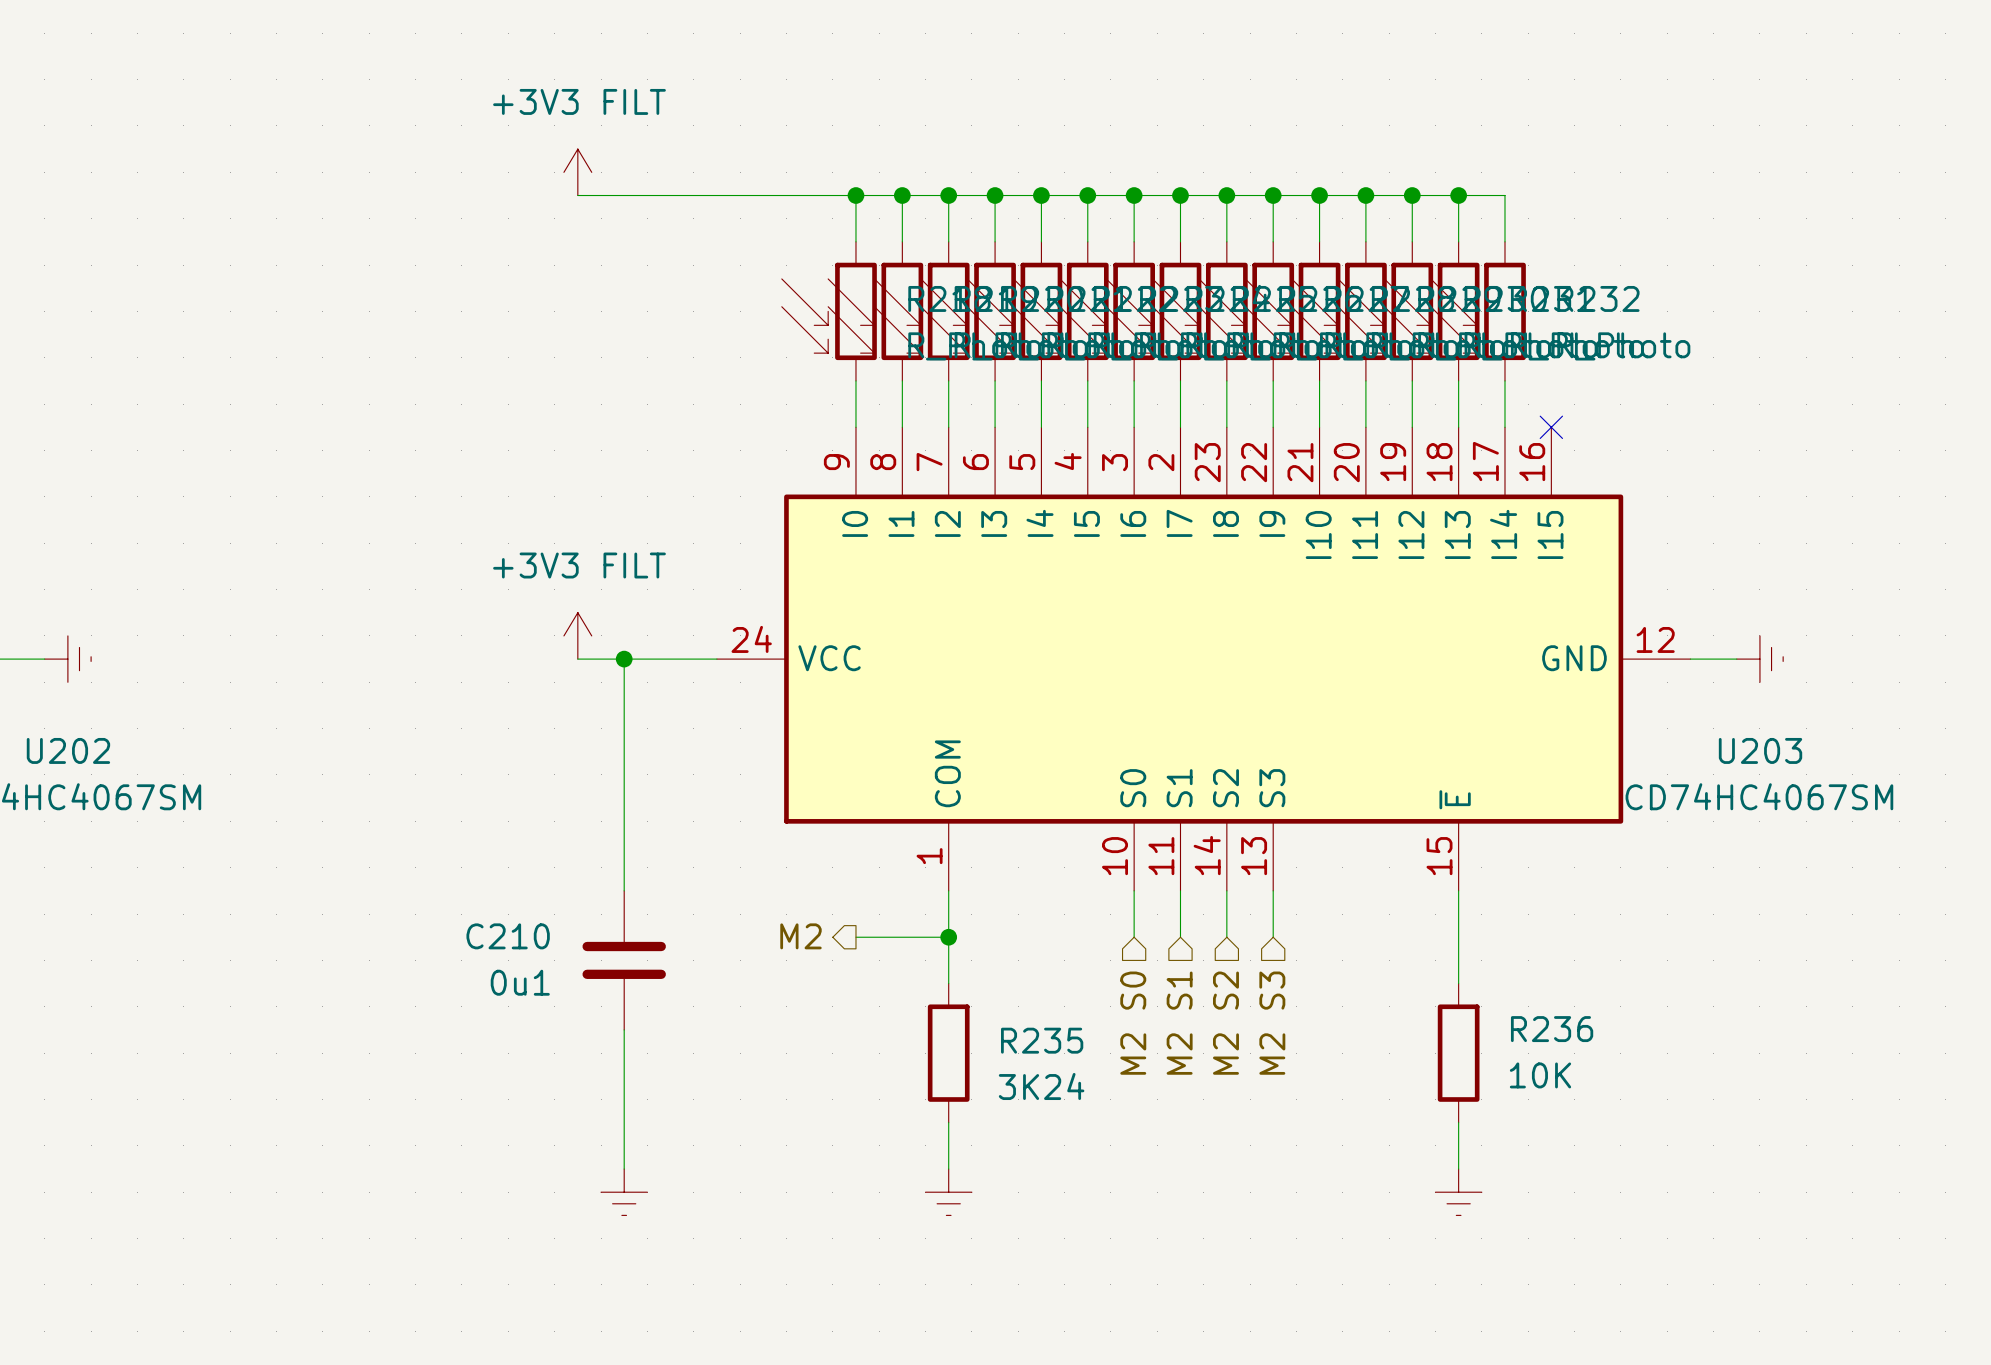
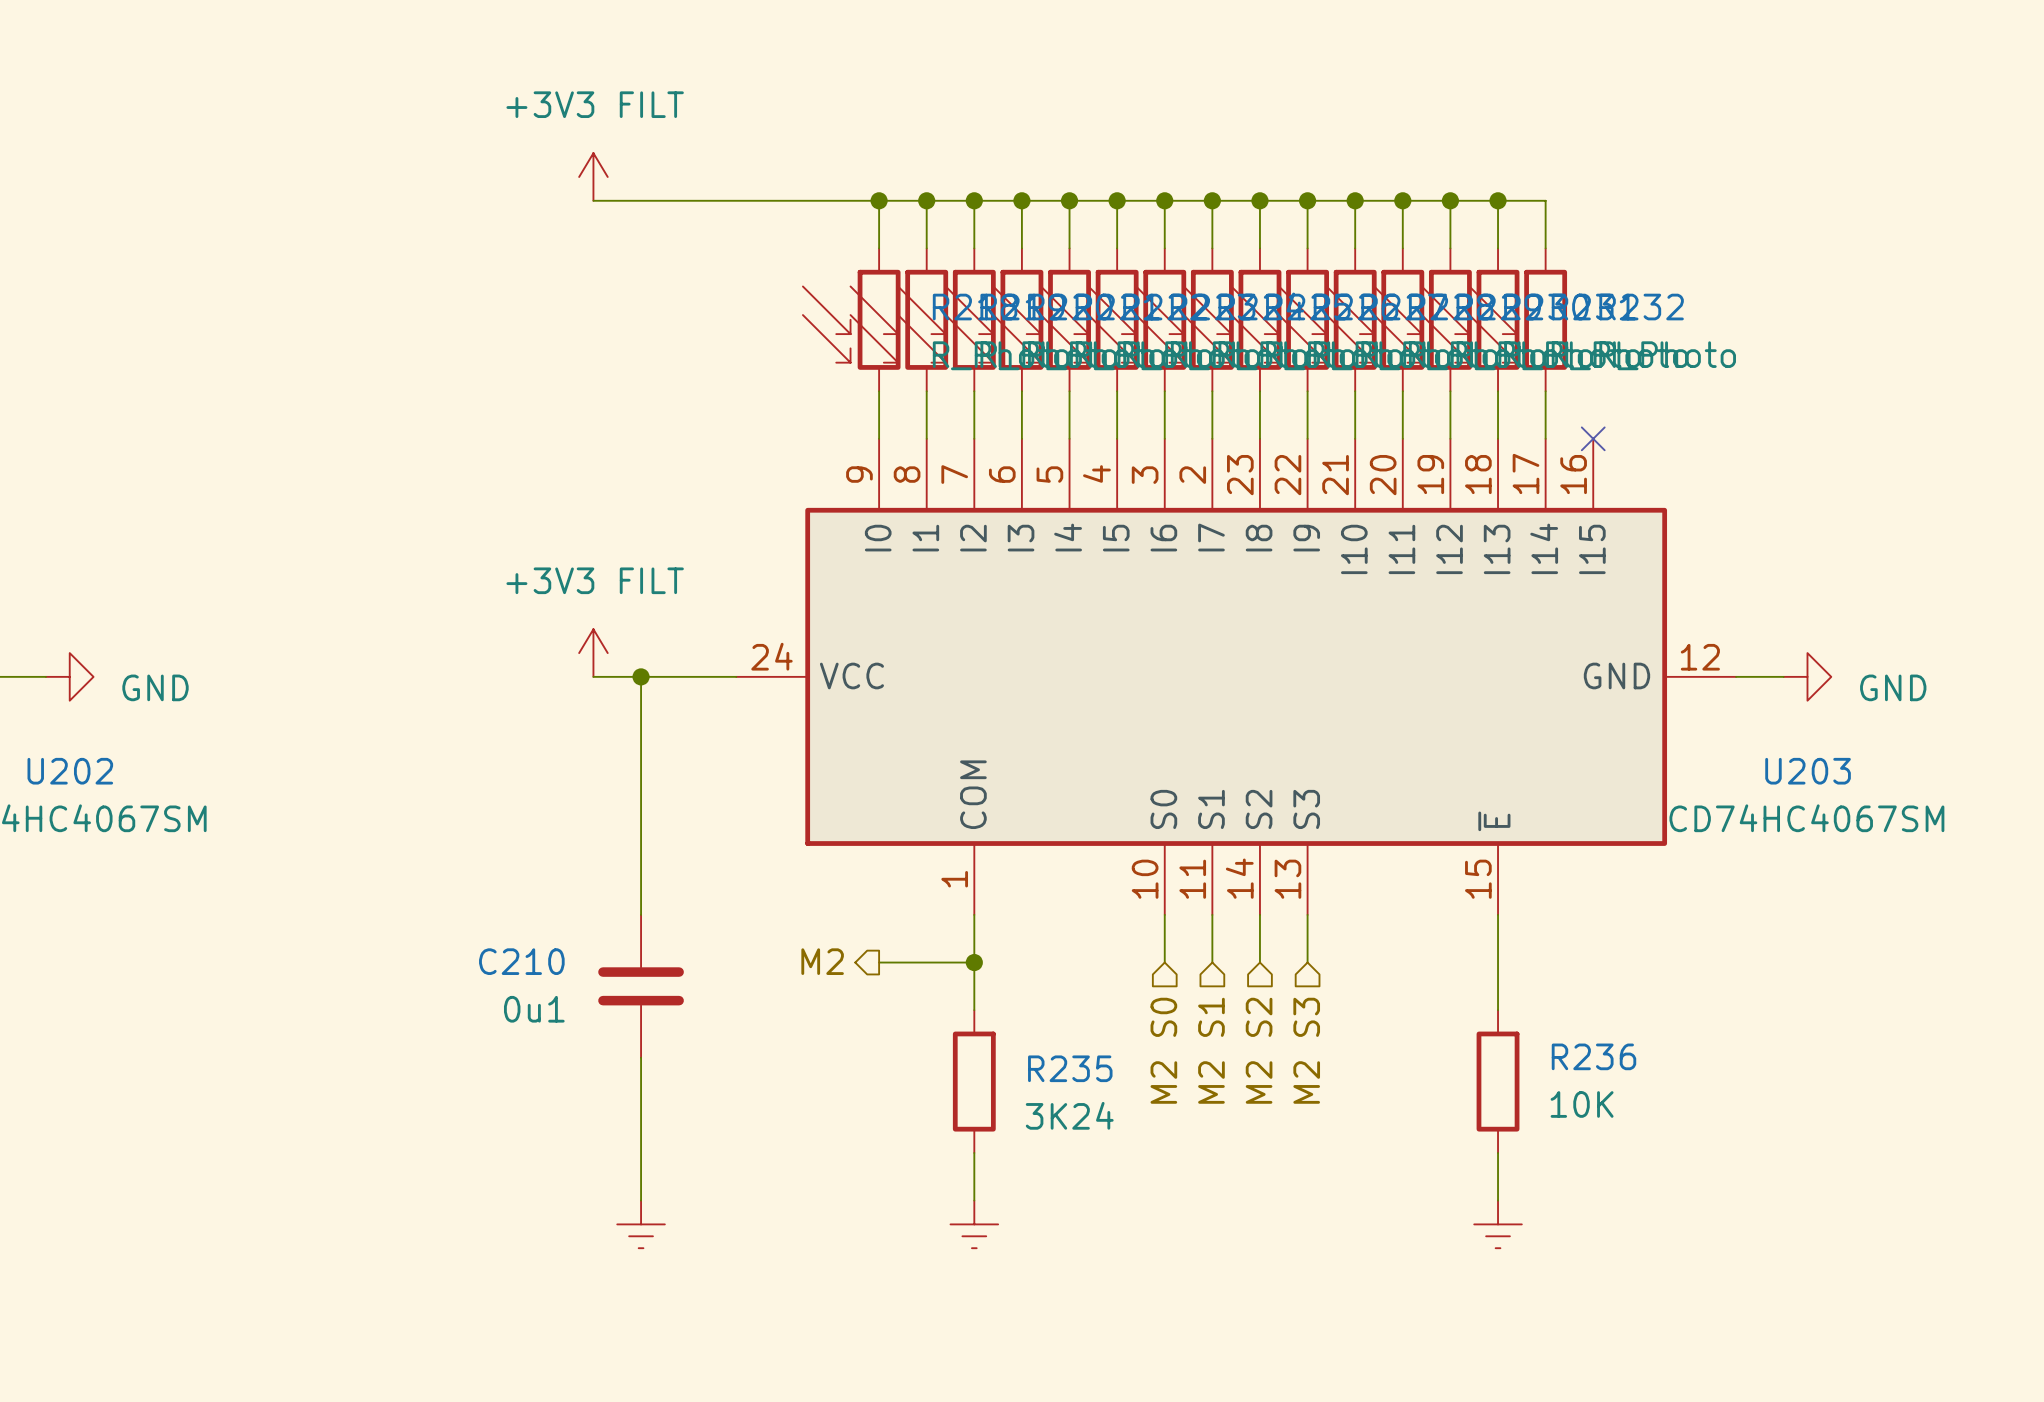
power symbol shape: [44, 635, 92, 683] -> [45, 653, 94, 701]
power symbol shape: [1736, 635, 1784, 683] -> [1783, 653, 1832, 701]
power symbol text: none -> GND (155, 687)
power symbol text: none -> GND (1893, 687)

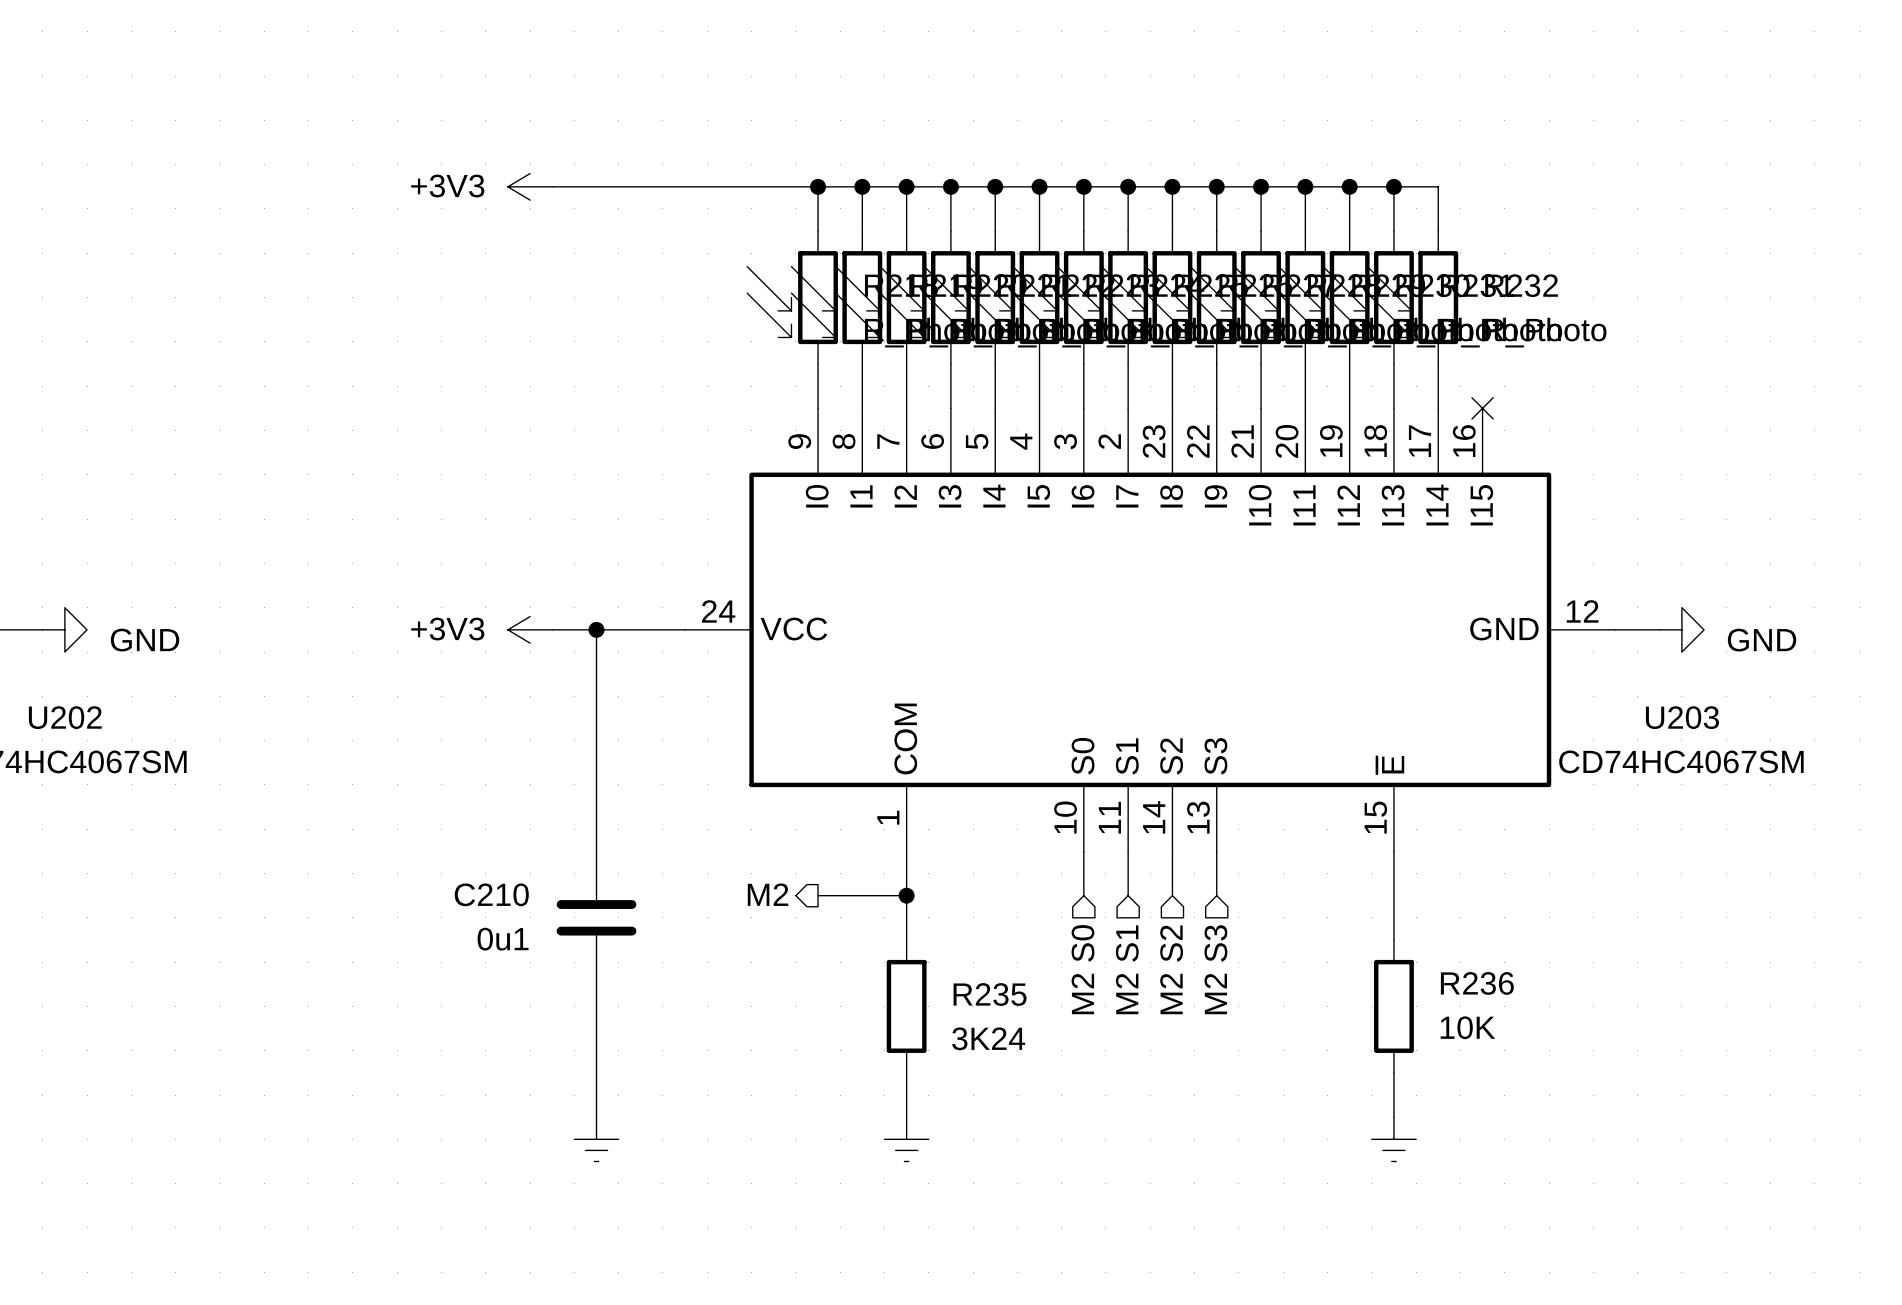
power symbol: +3V3 FILT (593, 176) -> none
power symbol: none -> +3V3 (530, 186)
power symbol: +3V3 FILT (593, 653) -> none
power symbol: none -> +3V3 (530, 629)

